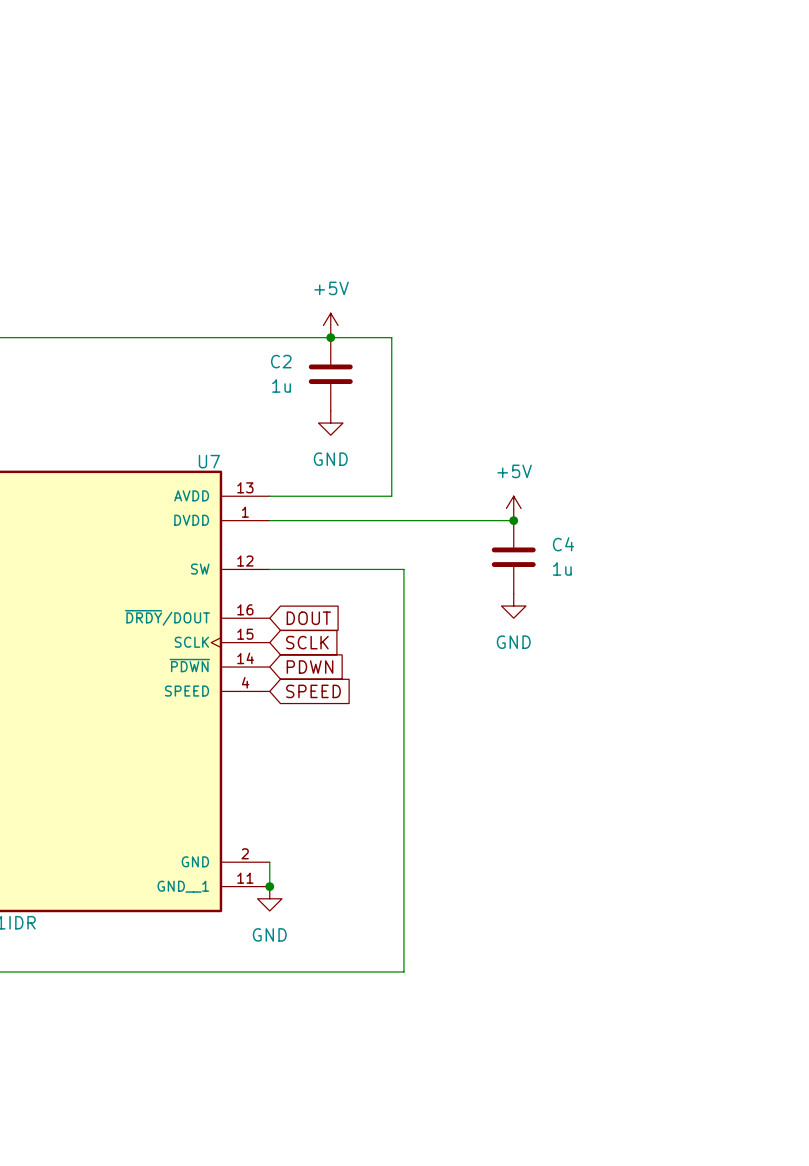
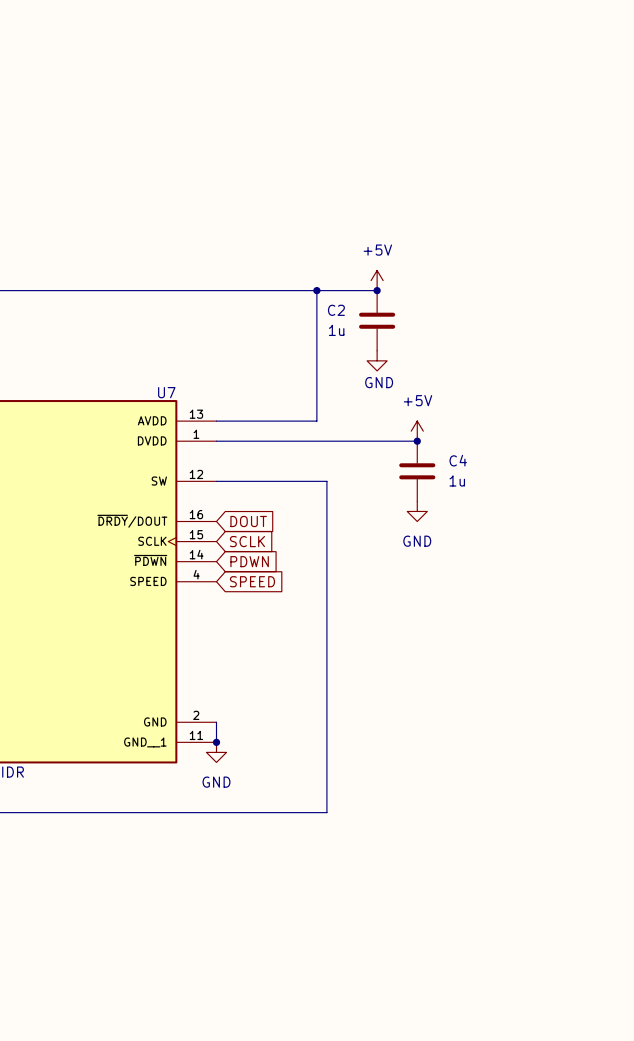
power symbol position: +5V (330, 325) -> +5V (377, 280)
junction: (330, 337) -> none
wire: none -> (316, 290) (377, 290)
junction: none -> (316, 290)
junction: none -> (377, 290)
C2 position: (330, 374) -> (377, 320)
power symbol position: GND (330, 423) -> GND (377, 360)
power symbol text position: GND (330, 459) -> GND (379, 382)

